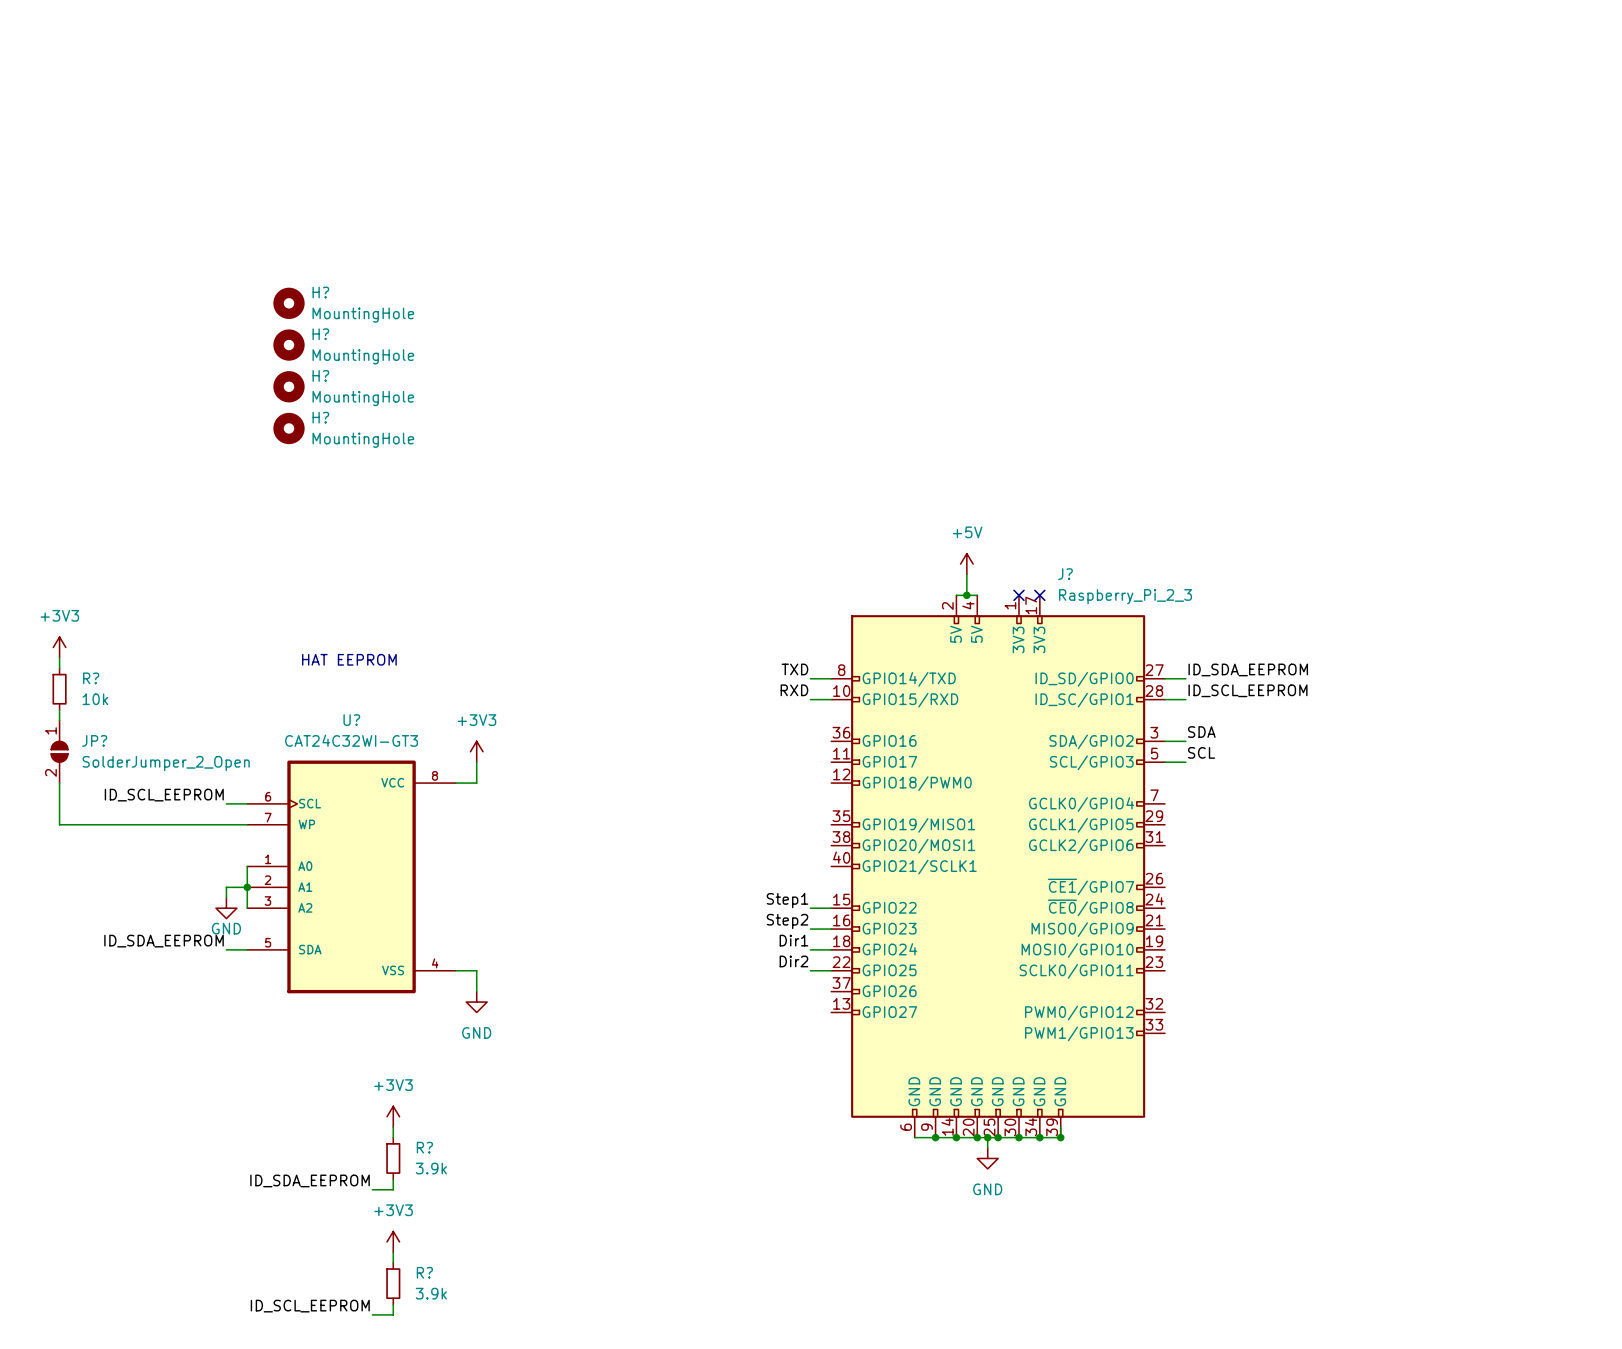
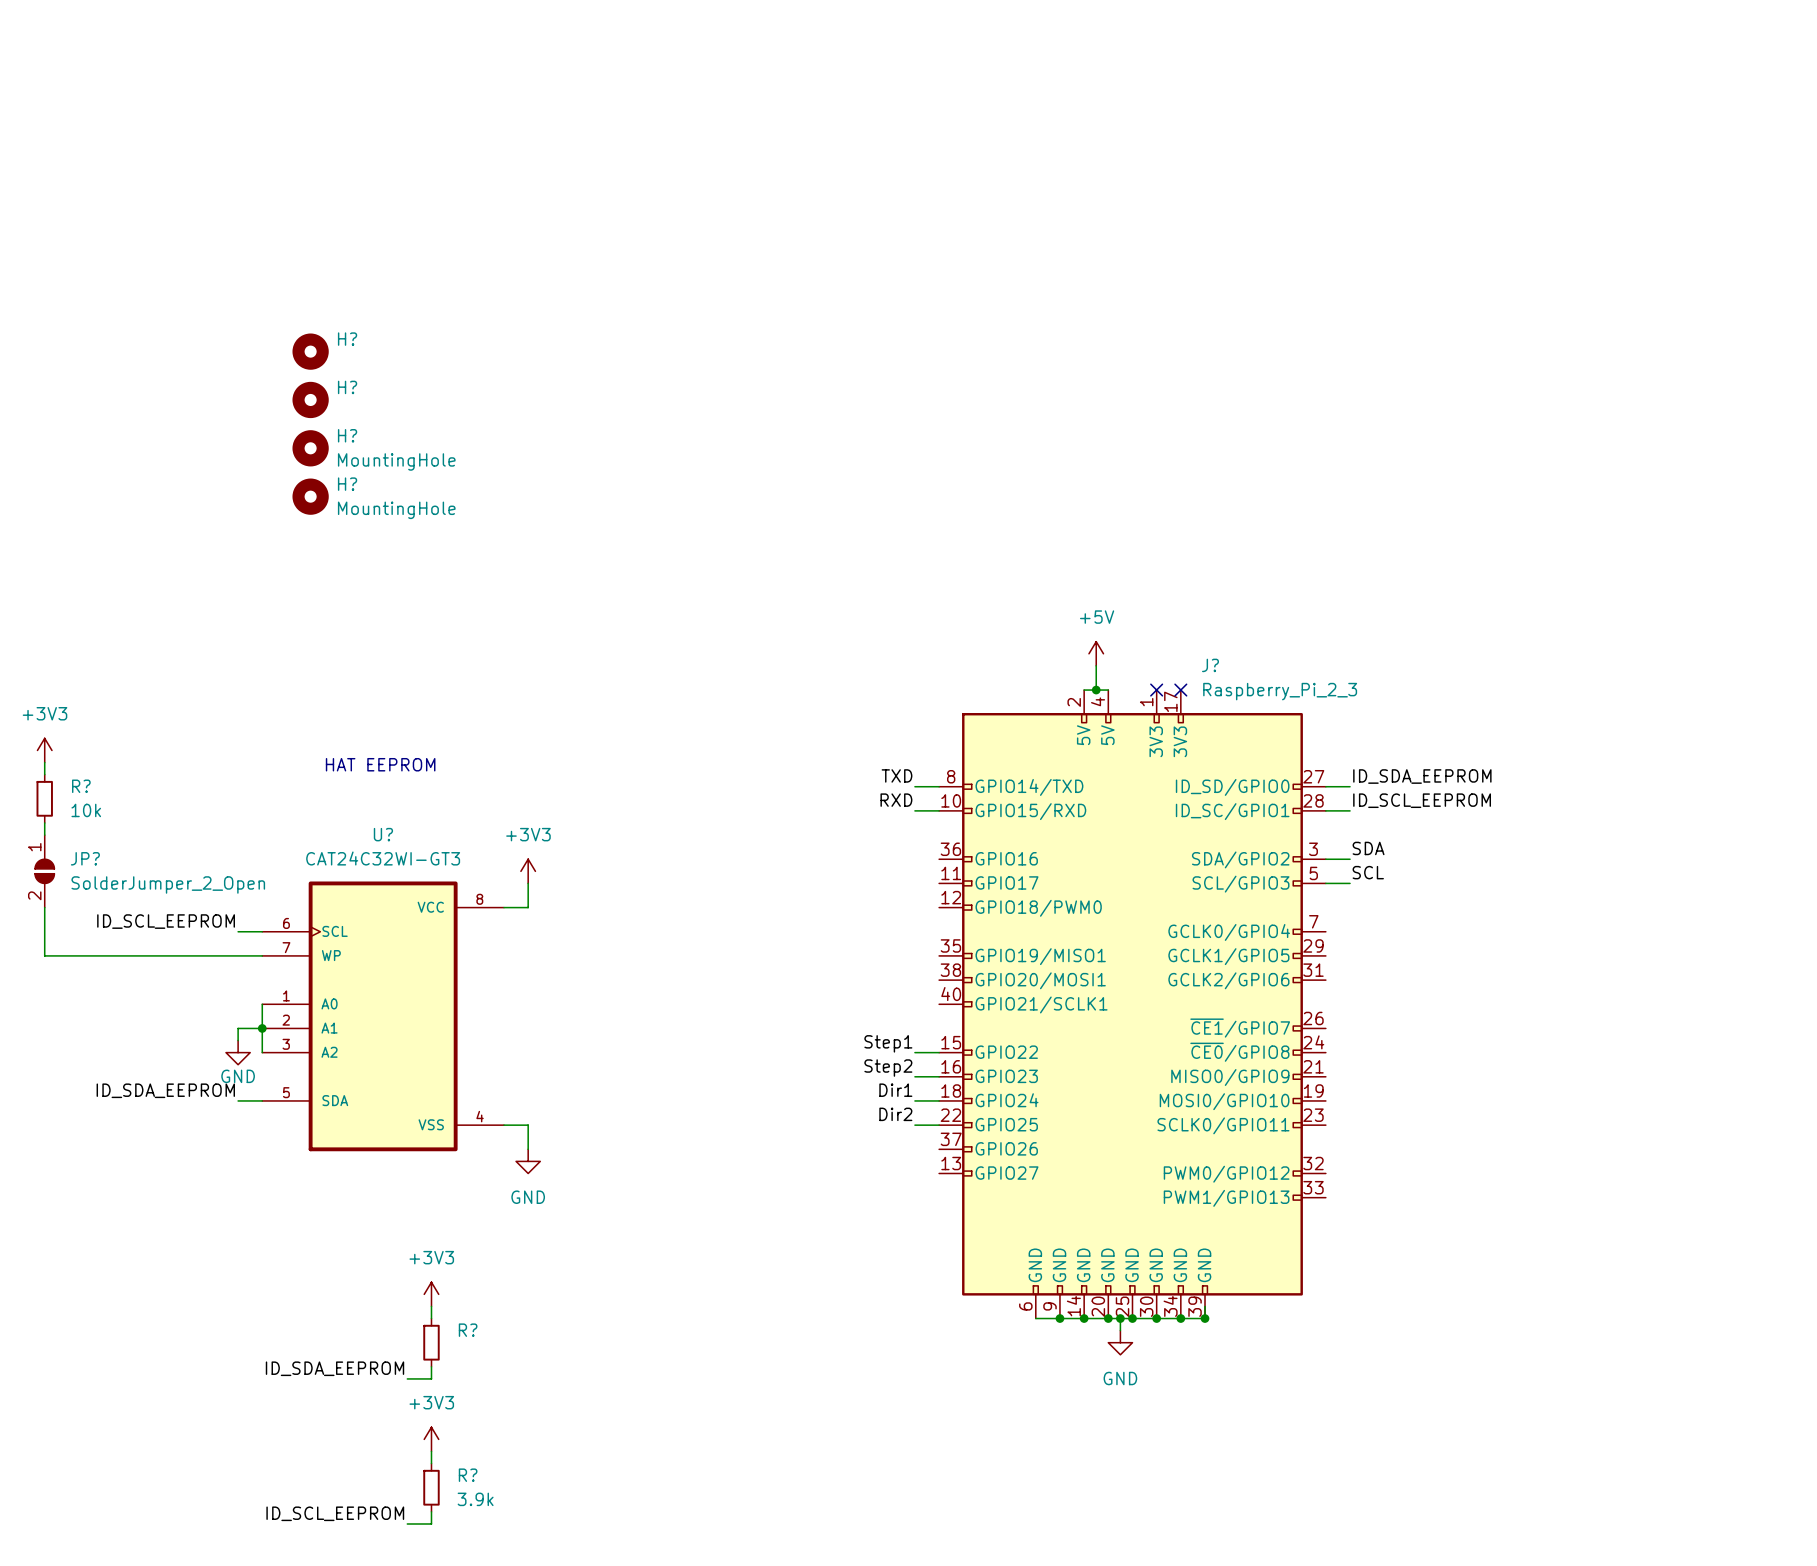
H? value: MountingHole (363, 315) -> none
H? value: MountingHole (363, 356) -> none
R? value: 3.9k (431, 1168) -> none

